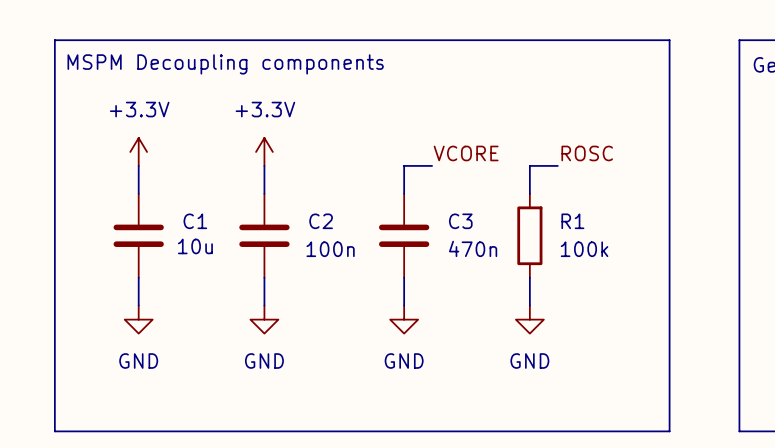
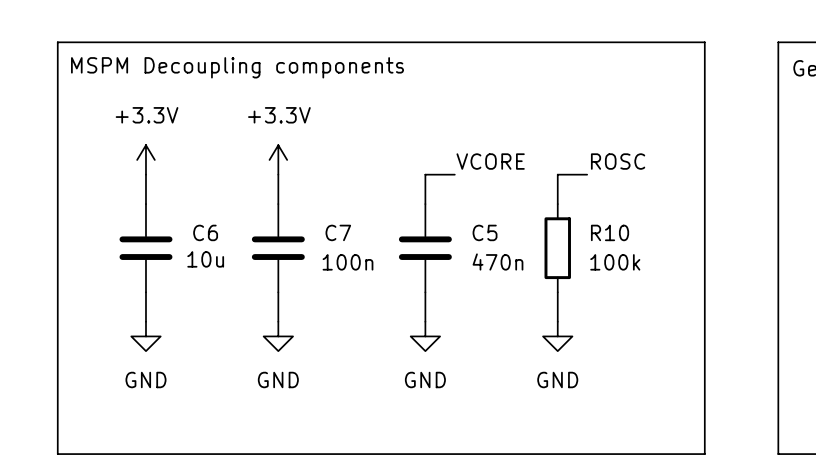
C1 name: C1 (195, 221) -> C6 (205, 232)
C2 name: C2 (321, 221) -> C7 (338, 232)
C3 name: C3 (460, 221) -> C5 (485, 232)
R1 name: R1 (572, 221) -> R10 (610, 232)

